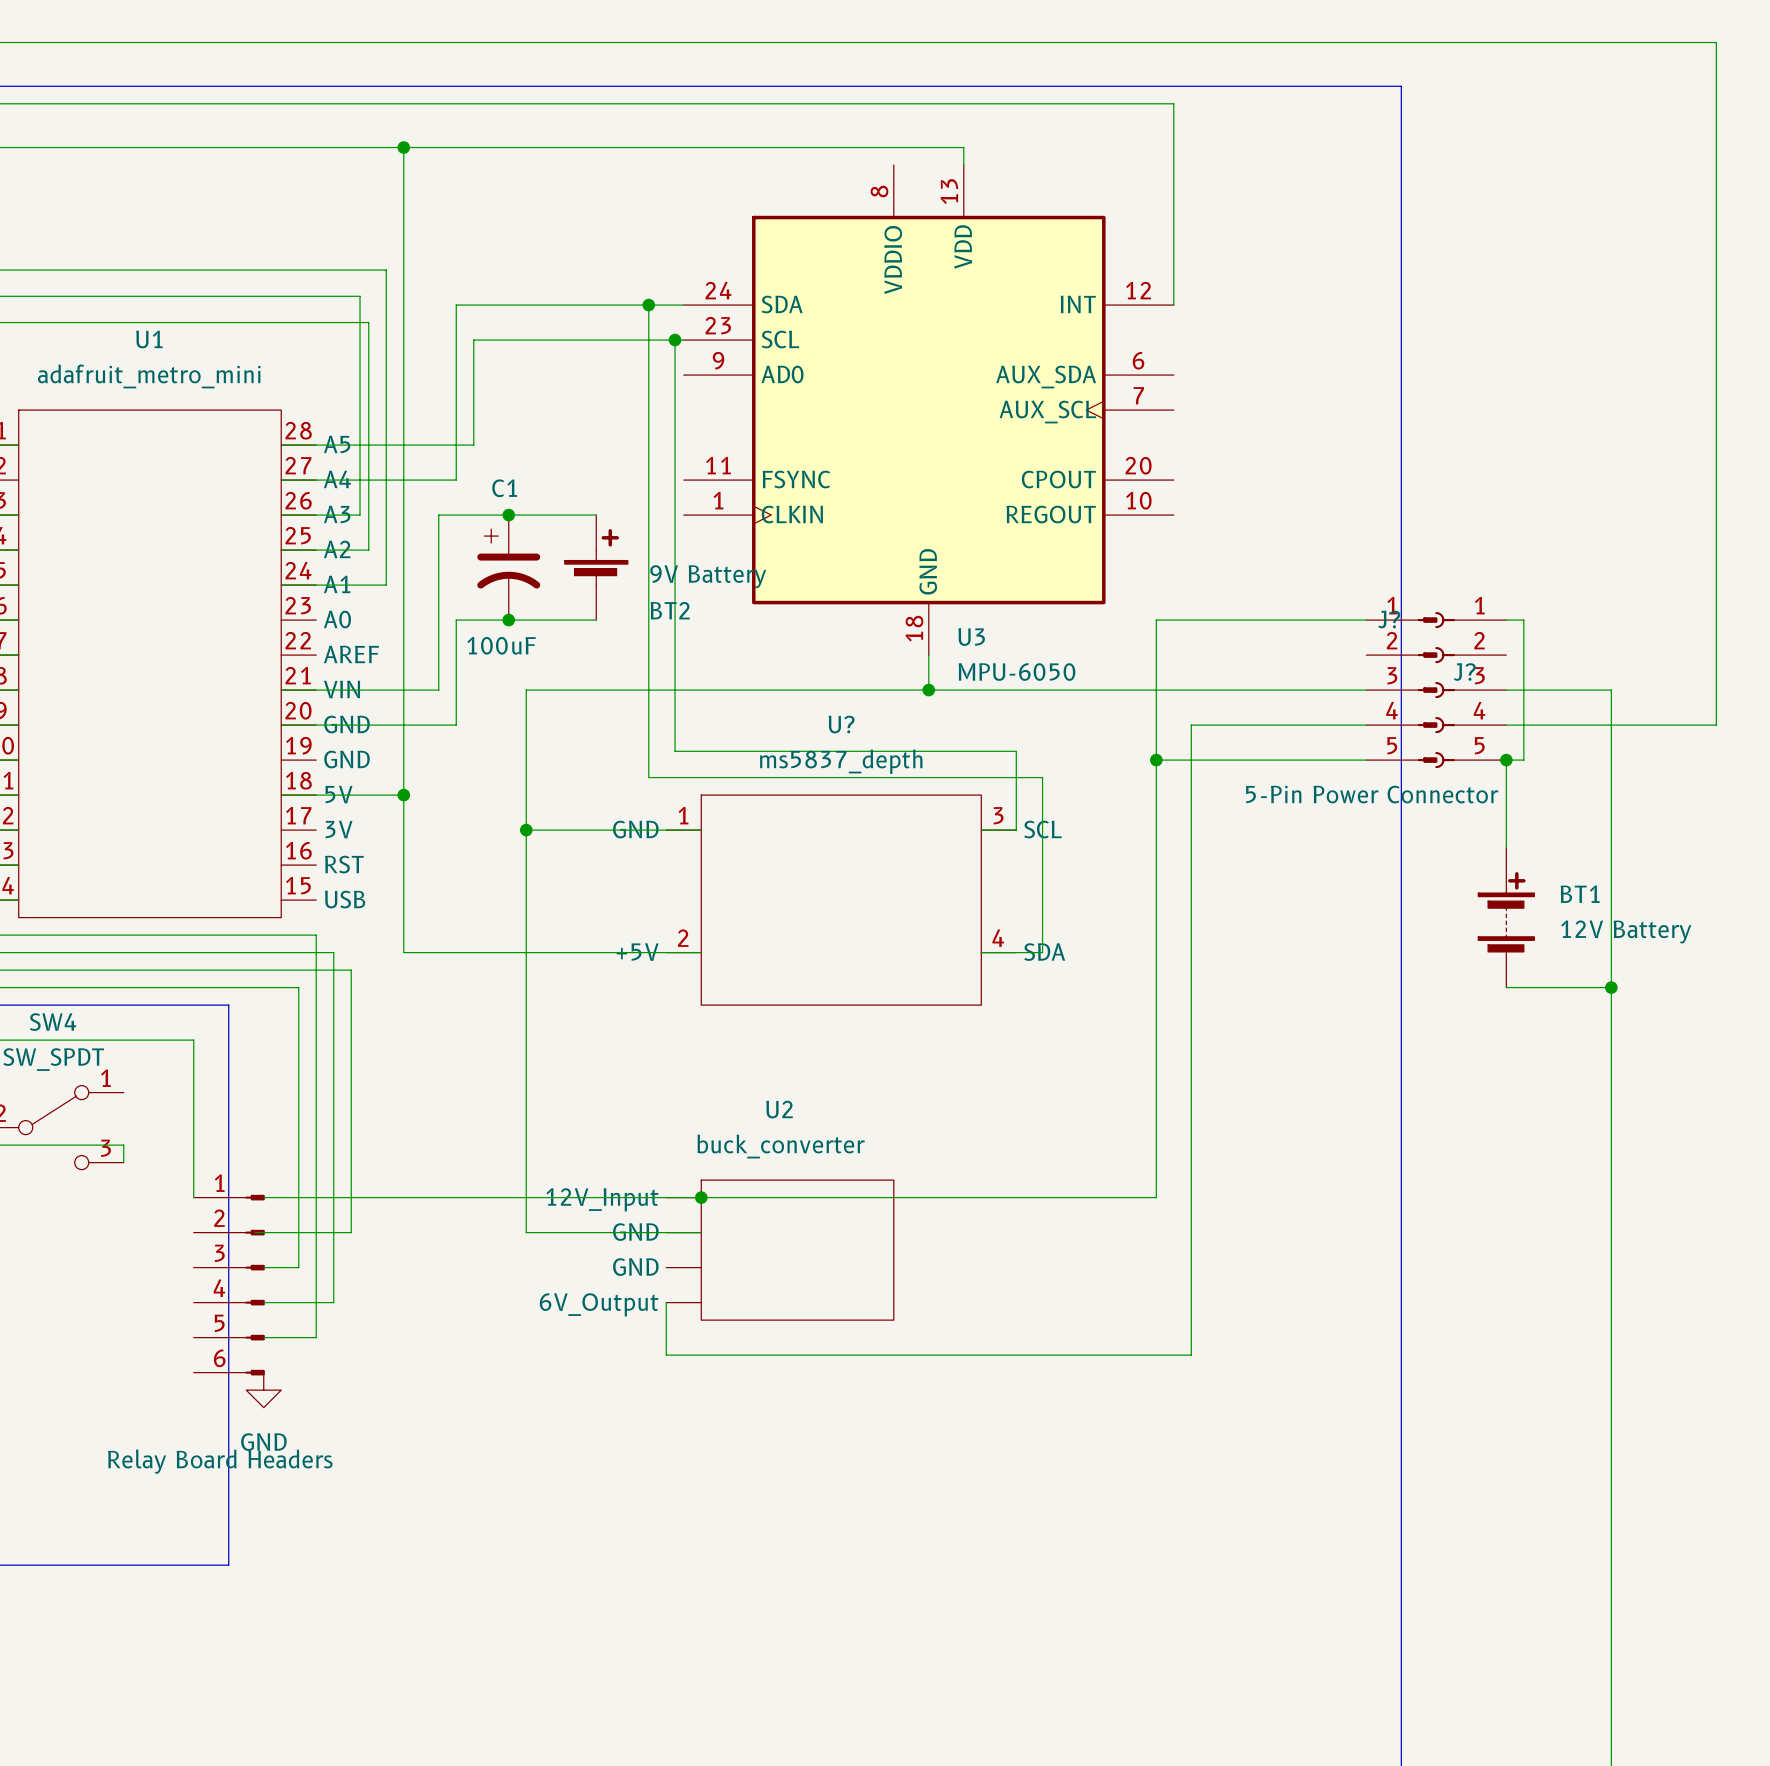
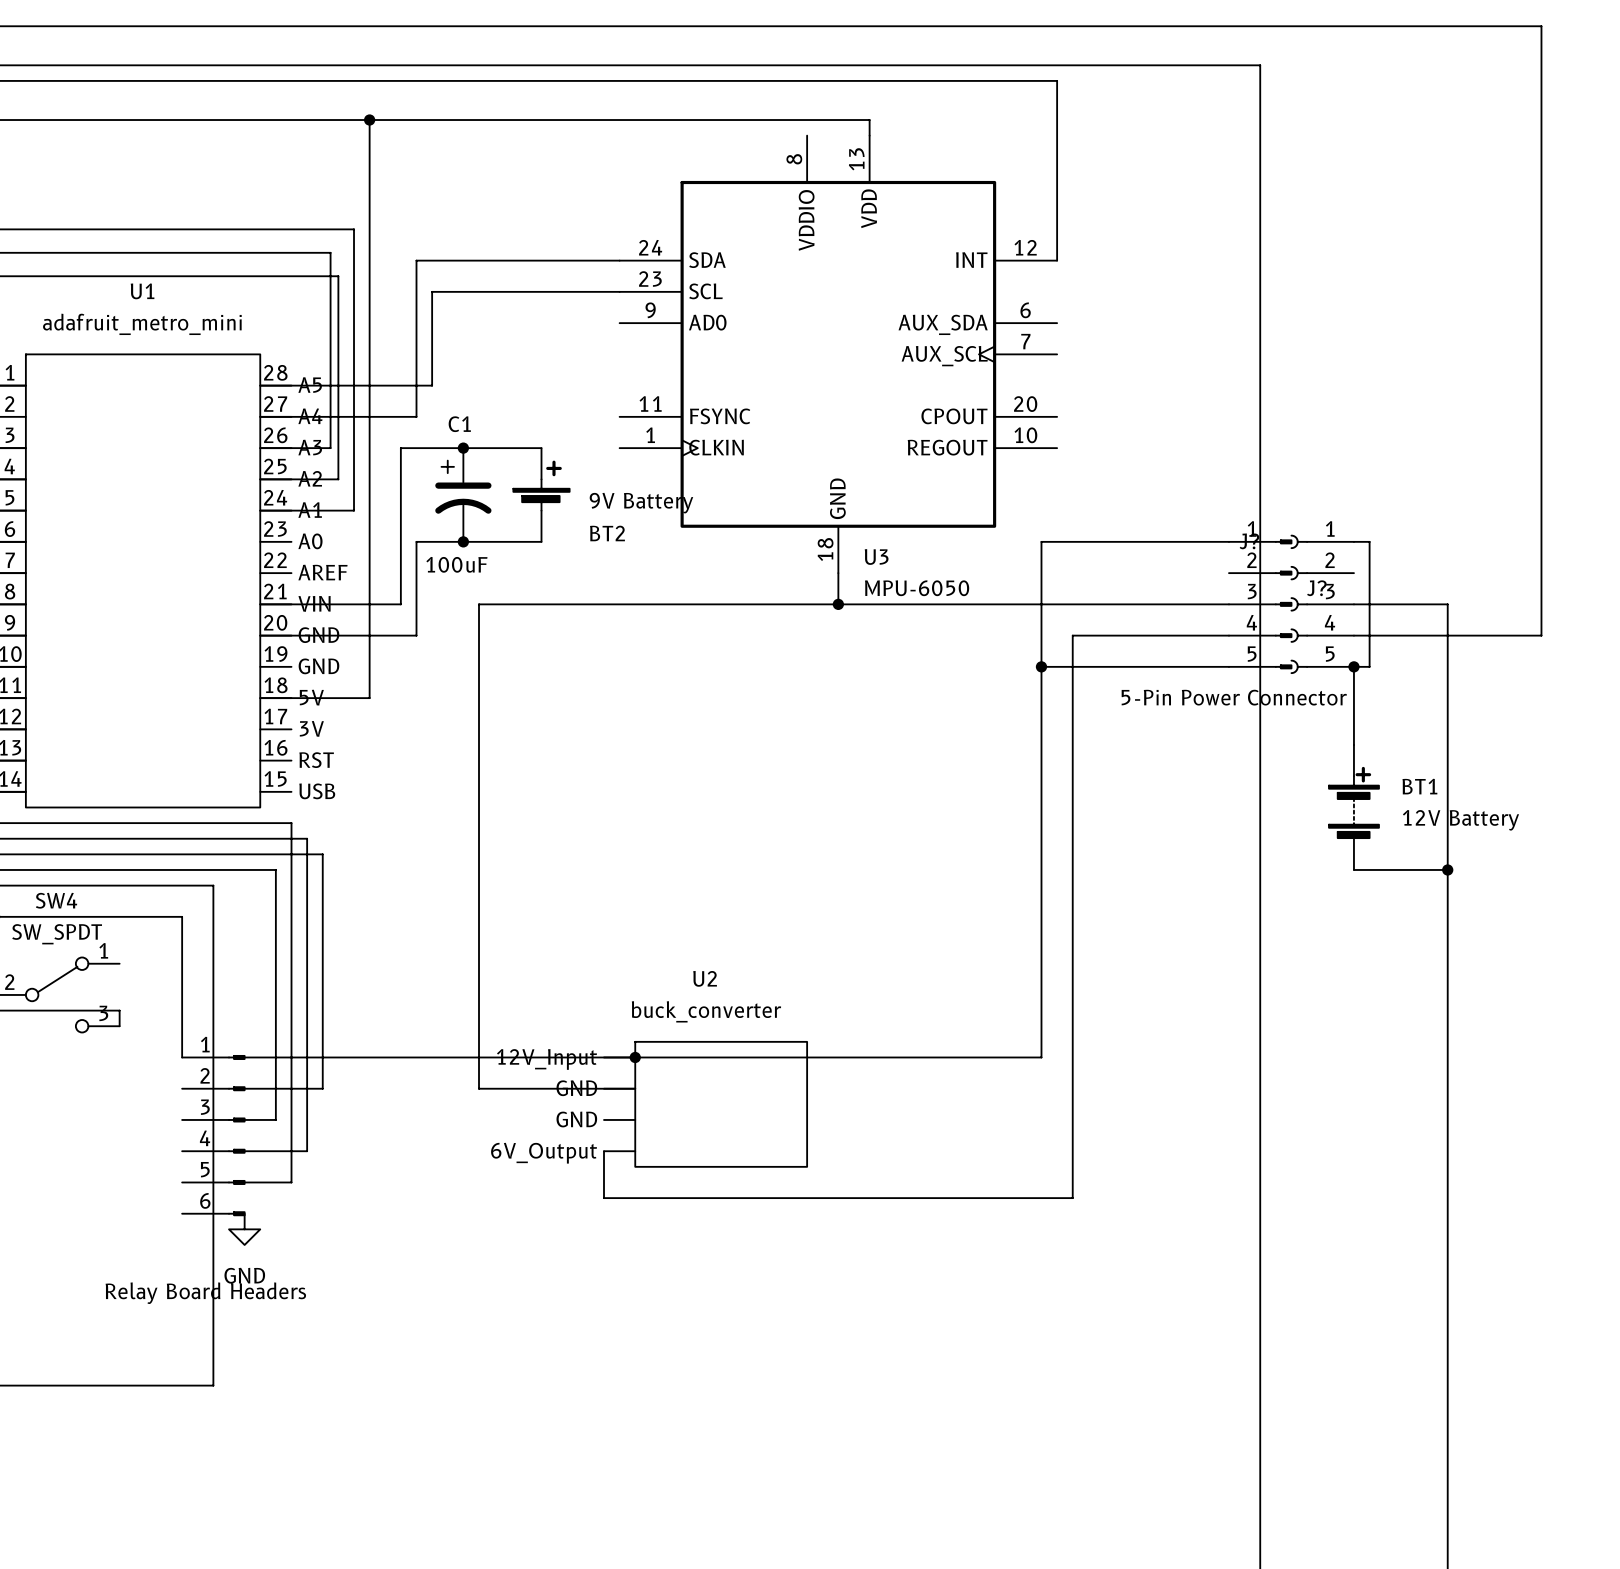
wire: (648, 305) (648, 777) (1042, 777) (1042, 952) (981, 952) -> none
junction: (648, 305) -> none
wire: (675, 340) (675, 751) (1016, 751) (1016, 830) (981, 830) -> none
junction: (675, 340) -> none
wire: (403, 795) (403, 952) (701, 952) -> none
junction: (403, 795) -> none
wire: (526, 830) (701, 830) -> none
junction: (526, 830) -> none
U?: ms5837_depth (841, 900) -> none

